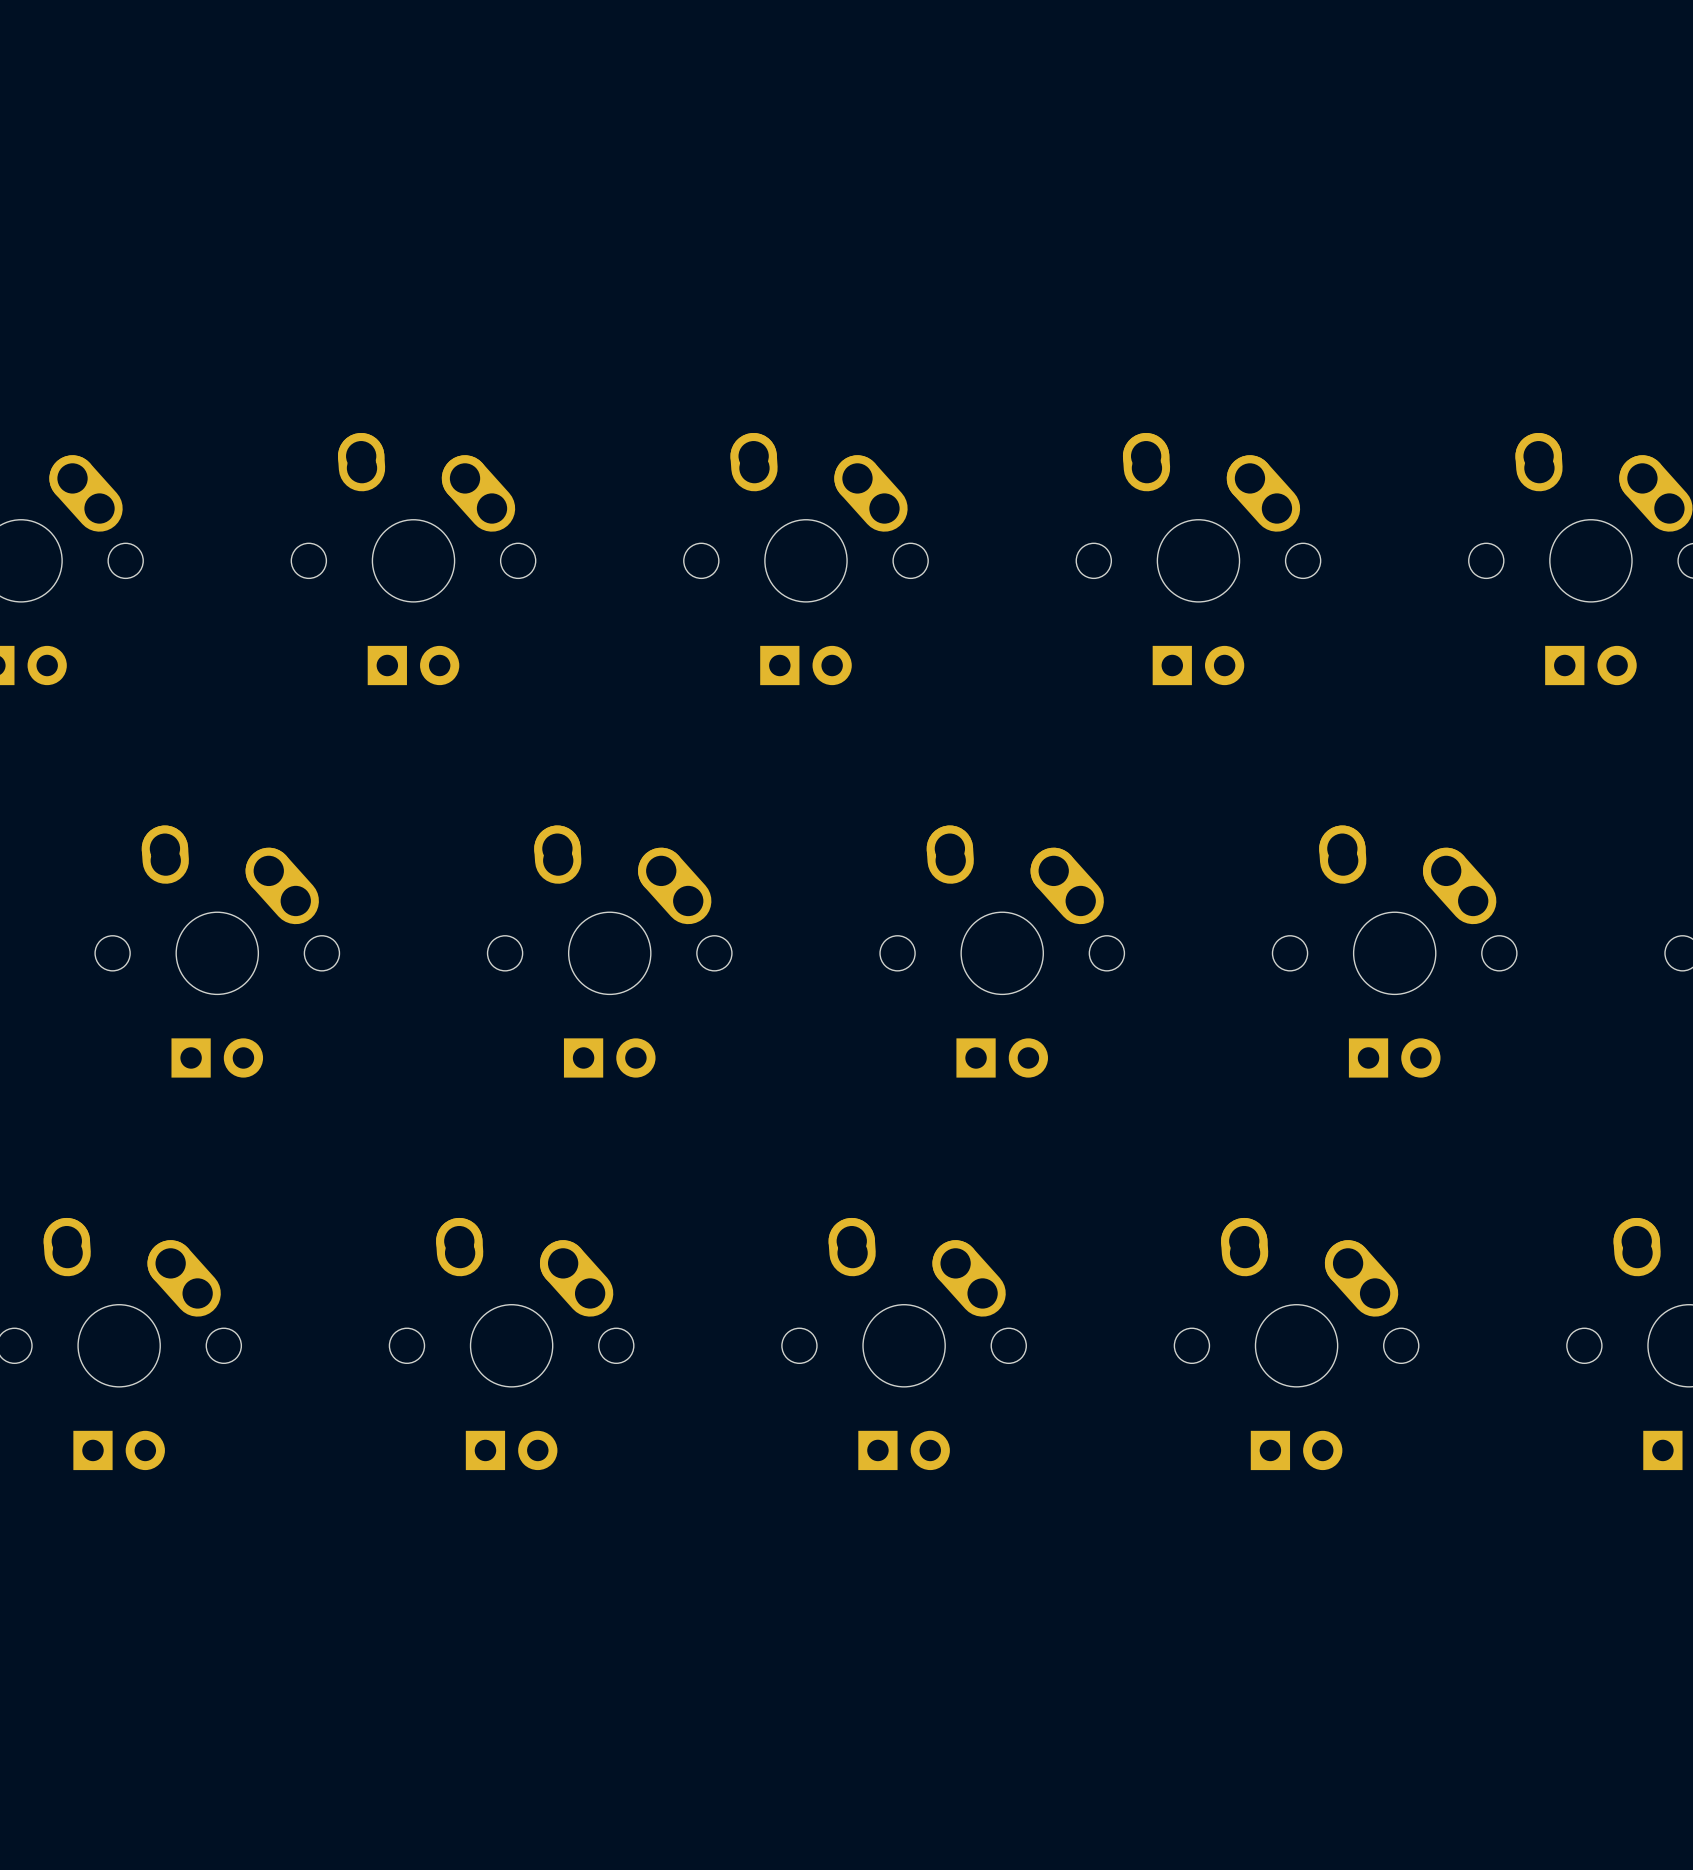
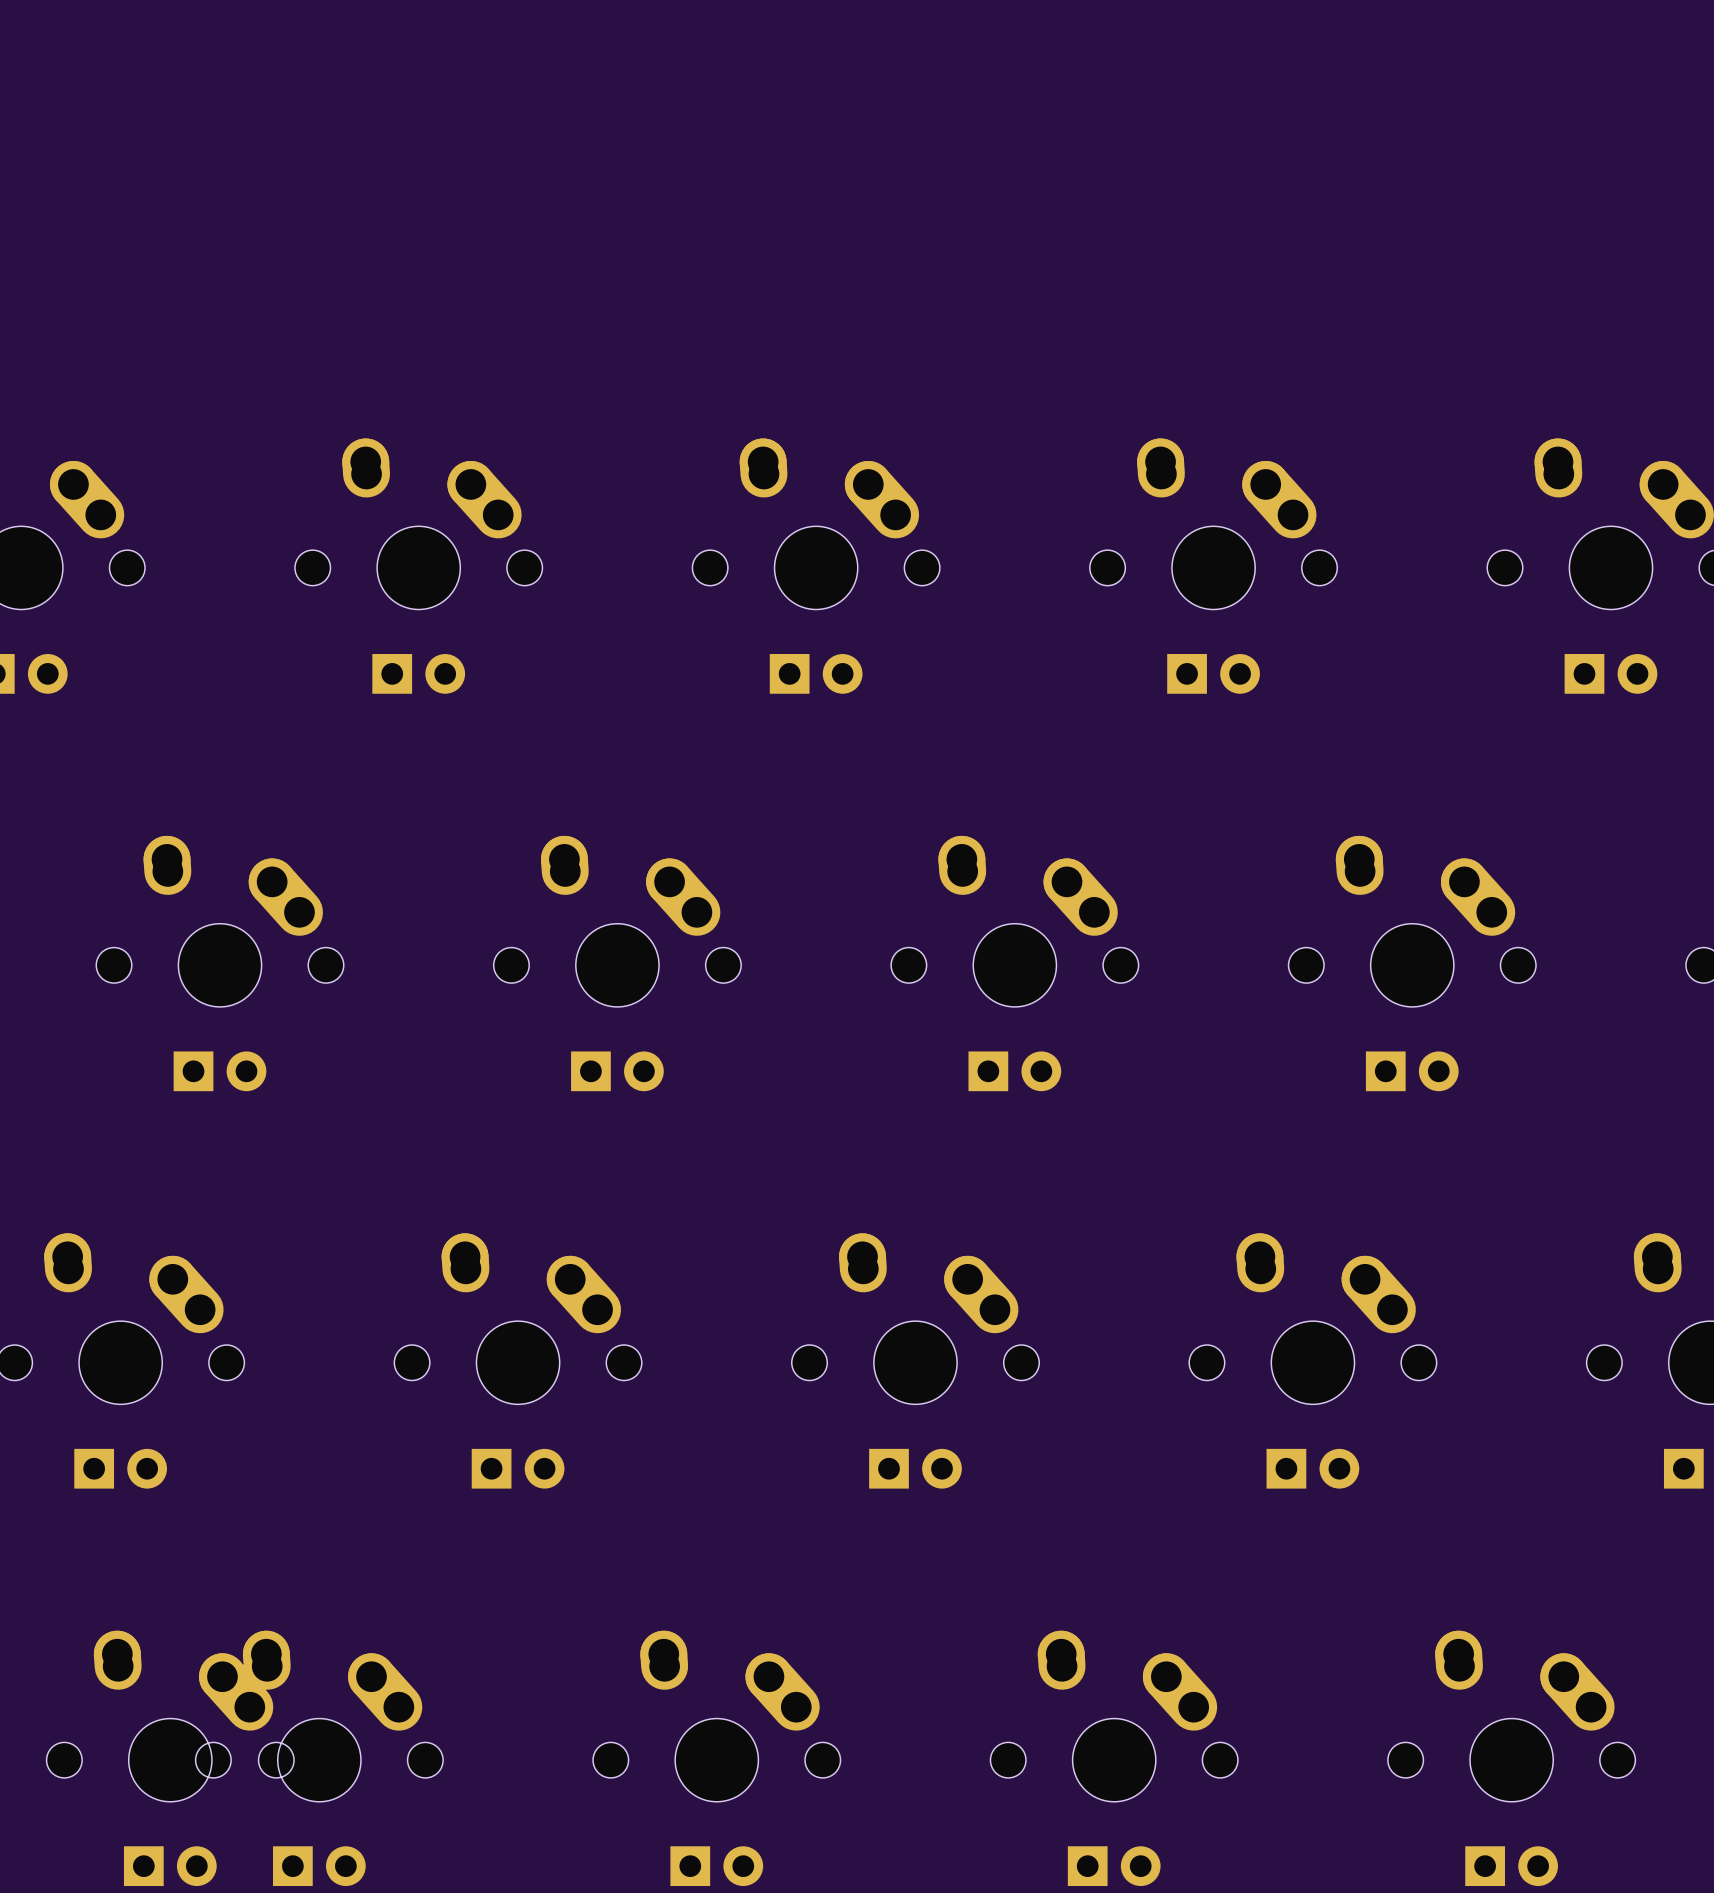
part: none -> (170, 1758)
part: none -> (319, 1758)
part: none -> (716, 1758)
part: none -> (1114, 1758)
part: none -> (1511, 1758)

